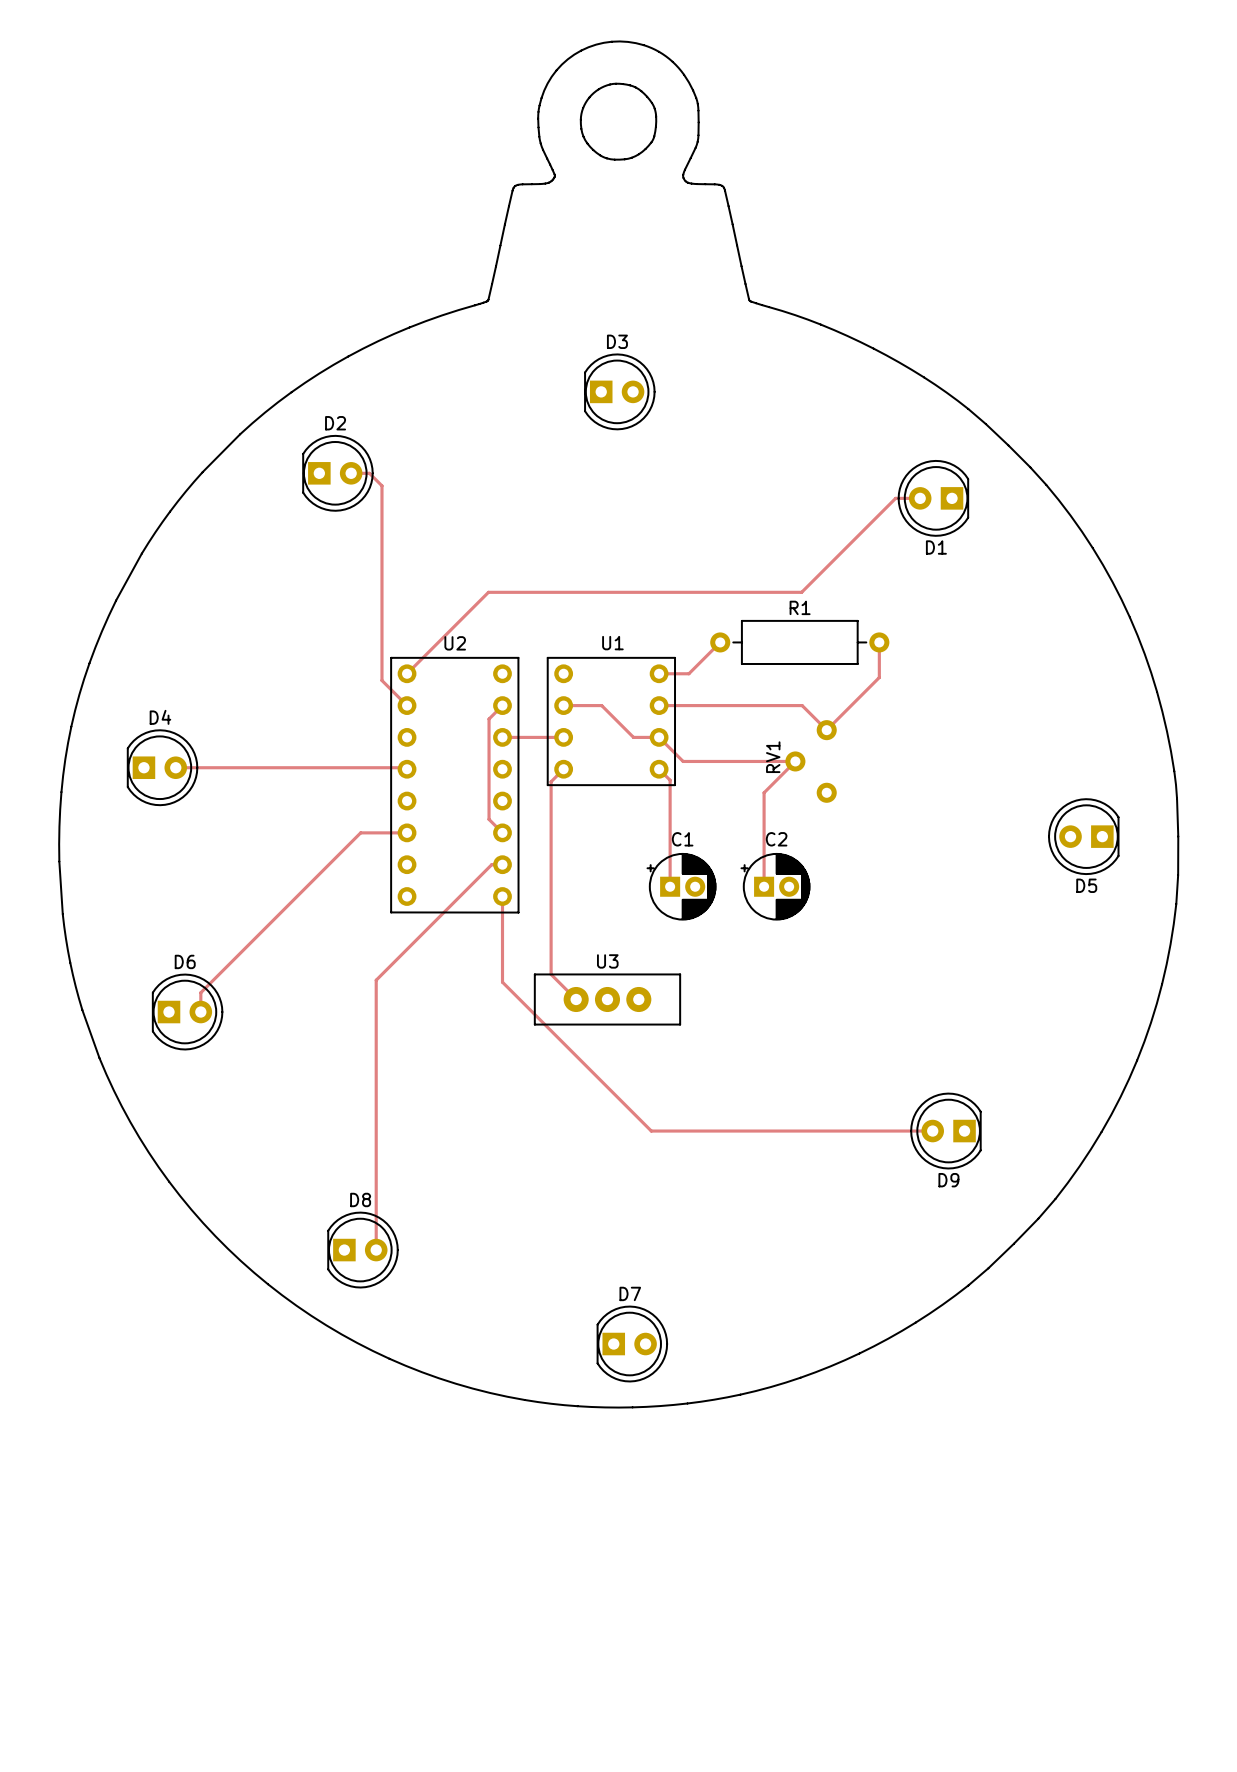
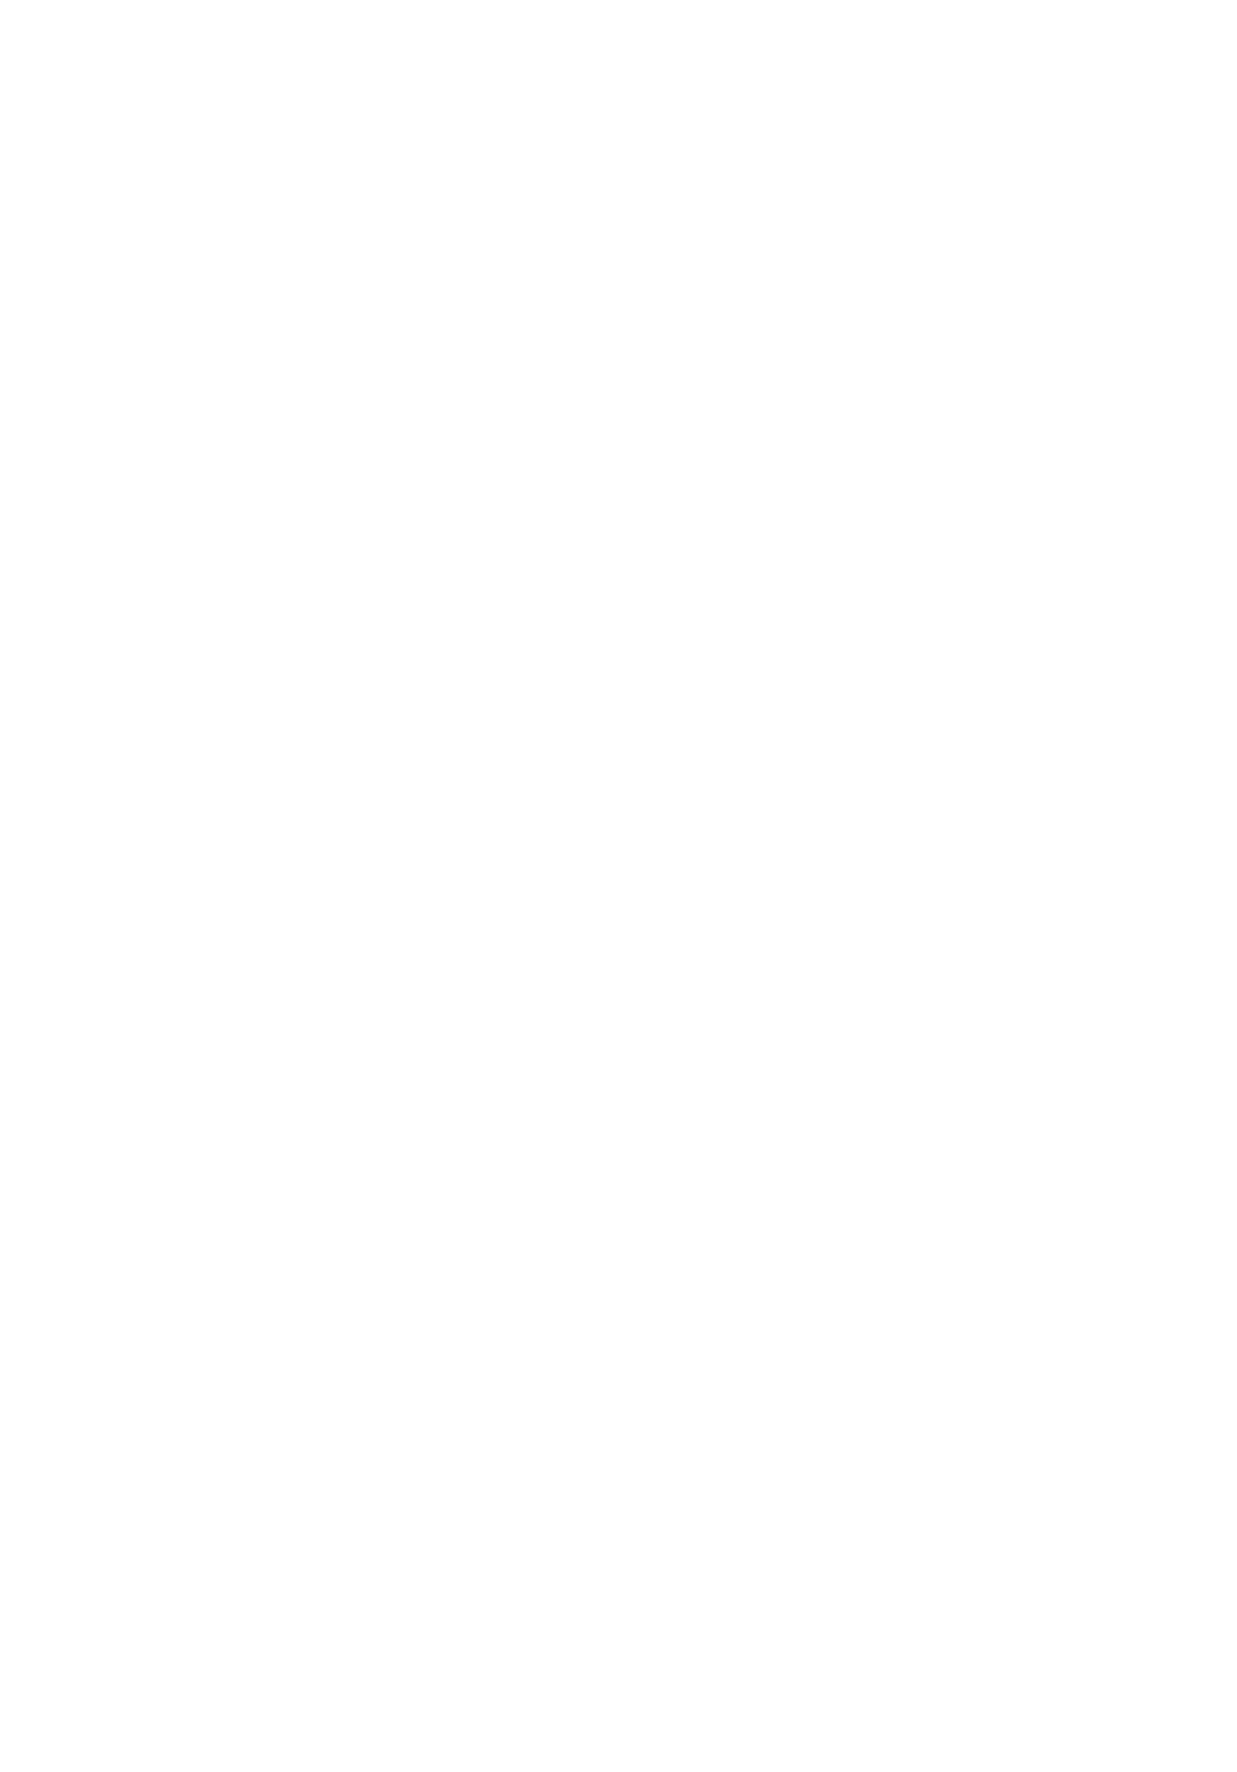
drawing: [59, 41, 1179, 1408] -> none
D3: (619, 391) -> none
D2: (337, 473) -> none
track: (351, 473) (369, 473) (381, 485) (381, 680) (407, 705) -> none
track: (920, 498) (895, 498) (801, 592) (488, 592) (407, 673) -> none
D1: (933, 498) -> none
track: (720, 642) (688, 673) (659, 673) -> none
R1: (799, 642) -> none
track: (879, 642) (879, 677) (826, 730) (802, 705) (659, 705) -> none
track: (502, 705) (489, 719) (489, 819) (502, 832) -> none
track: (563, 705) (601, 705) (633, 737) (659, 737) (683, 761) (795, 761) (764, 792) (764, 886) -> none
U1: (611, 721) -> none
track: (502, 737) (563, 737) -> none
RV1: (811, 761) -> none
D4: (162, 767) -> none
track: (175, 767) (407, 769) -> none
track: (563, 769) (551, 781) (551, 974) (576, 999) -> none
track: (659, 769) (670, 780) (670, 886) -> none
U2: (454, 785) -> none
track: (407, 832) (360, 832) (200, 992) (200, 1012) -> none
D5: (1083, 836) -> none
track: (502, 864) (491, 864) (376, 980) (376, 1250) -> none
C1: (681, 886) -> none
C2: (775, 886) -> none
track: (502, 896) (502, 982) (651, 1131) (932, 1131) -> none
U3: (607, 999) -> none
D6: (187, 1012) -> none
D9: (945, 1131) -> none
D8: (363, 1250) -> none
D7: (632, 1344) -> none

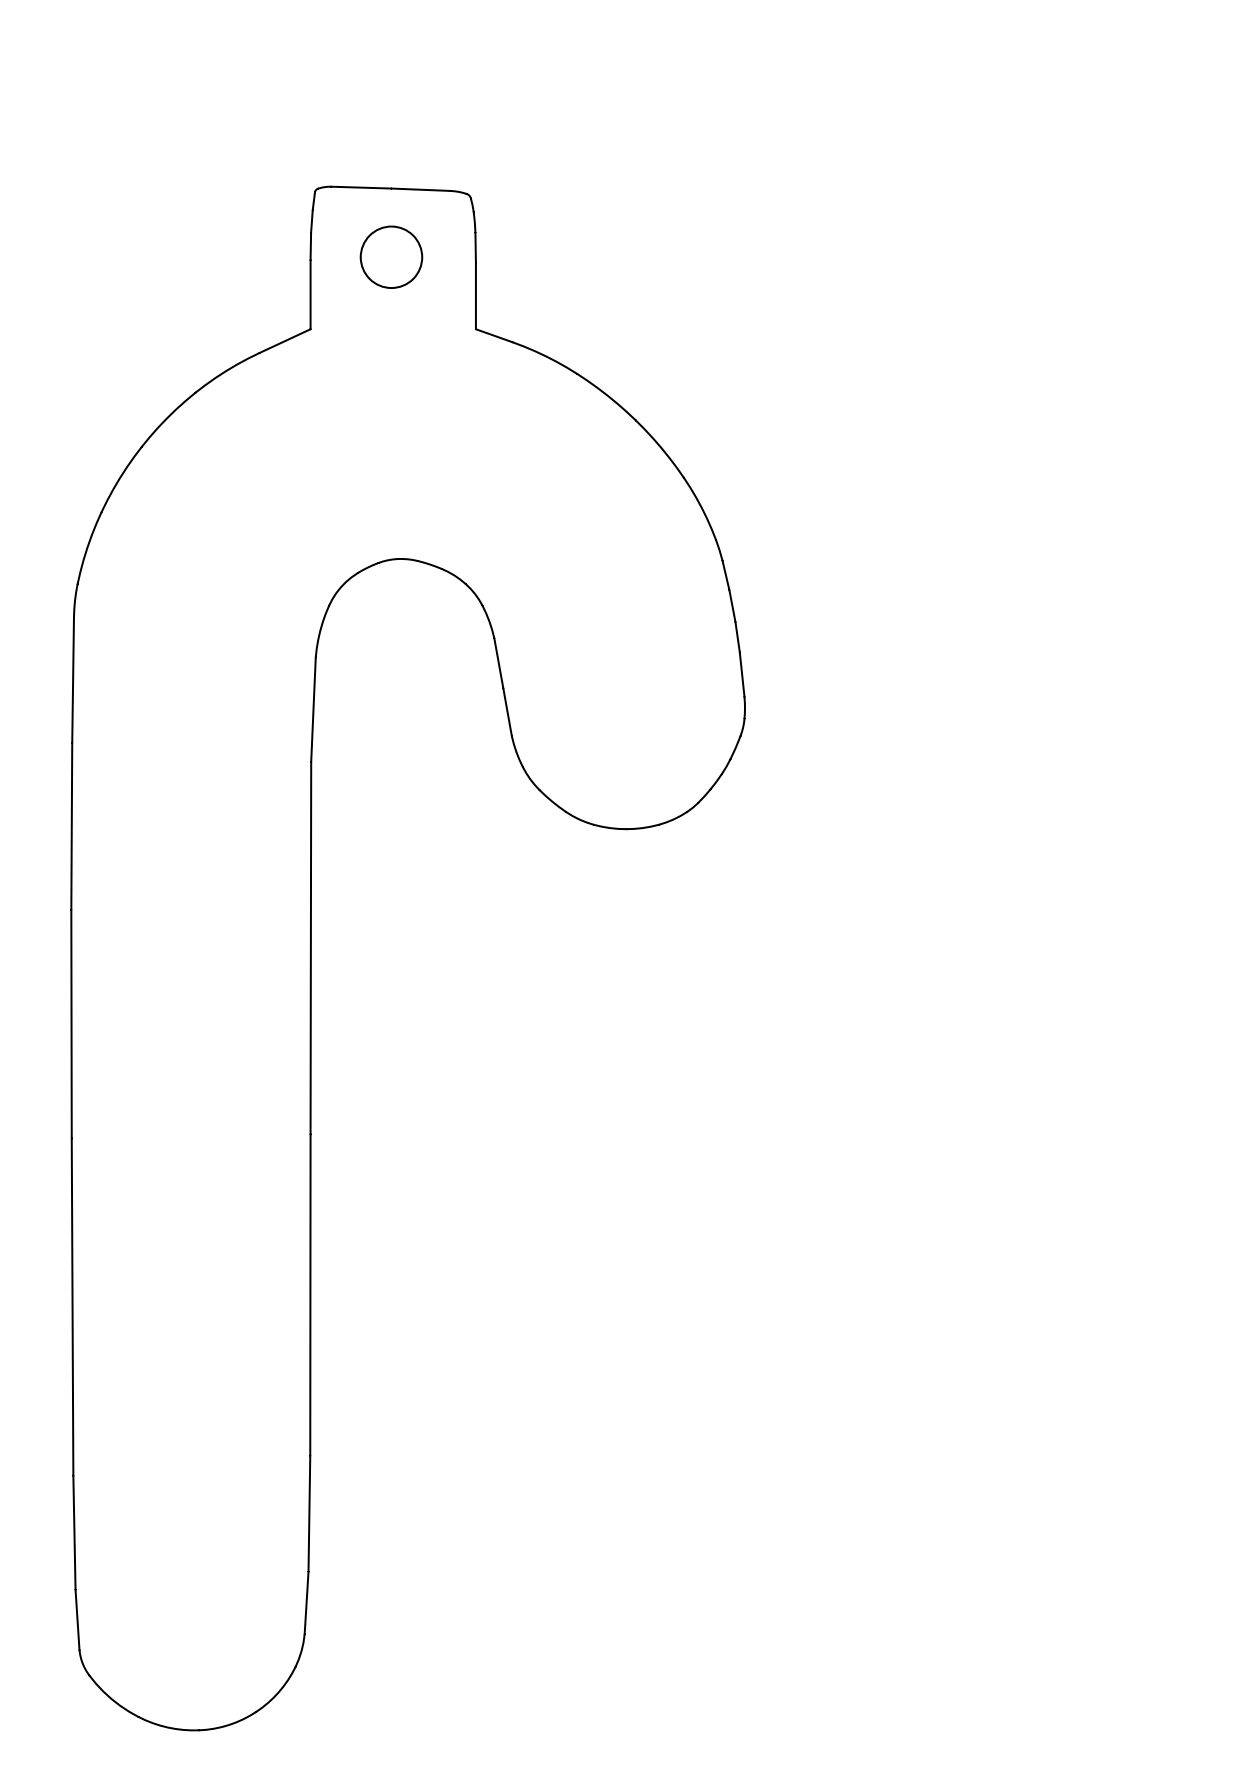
board edge: none -> (331, 186) (450, 190) (469, 196) (475, 232) (475, 329) (545, 356) (577, 373) (607, 395) (635, 420) (661, 447) (683, 477) (701, 507) (719, 550) (729, 589) (739, 652) (744, 718) (740, 736) (726, 766) (704, 796) (687, 811) (666, 822) (642, 828) (618, 828) (593, 824) (572, 816) (552, 801) (534, 784) (522, 767) (511, 736) (492, 629) (479, 599) (465, 584) (448, 571) (429, 564) (412, 559) (392, 559) (378, 562) (357, 573) (341, 587) (332, 599) (322, 622) (316, 648) (311, 761) (310, 1455) (308, 1571) (304, 1634) (301, 1651) (292, 1673) (278, 1692) (262, 1707) (242, 1719) (221, 1727) (199, 1730) (183, 1729) (153, 1723) (120, 1705) (103, 1691) (89, 1675) (82, 1663) (79, 1650) (75, 1589) (73, 1475) (71, 1138) (72, 743) (75, 600) (83, 559) (101, 512) (119, 478) (149, 437) (185, 400) (215, 377) (248, 358) (310, 329) (311, 232) (315, 192) (318, 188) (331, 186)
round board edge: none -> [360, 226, 423, 289]

